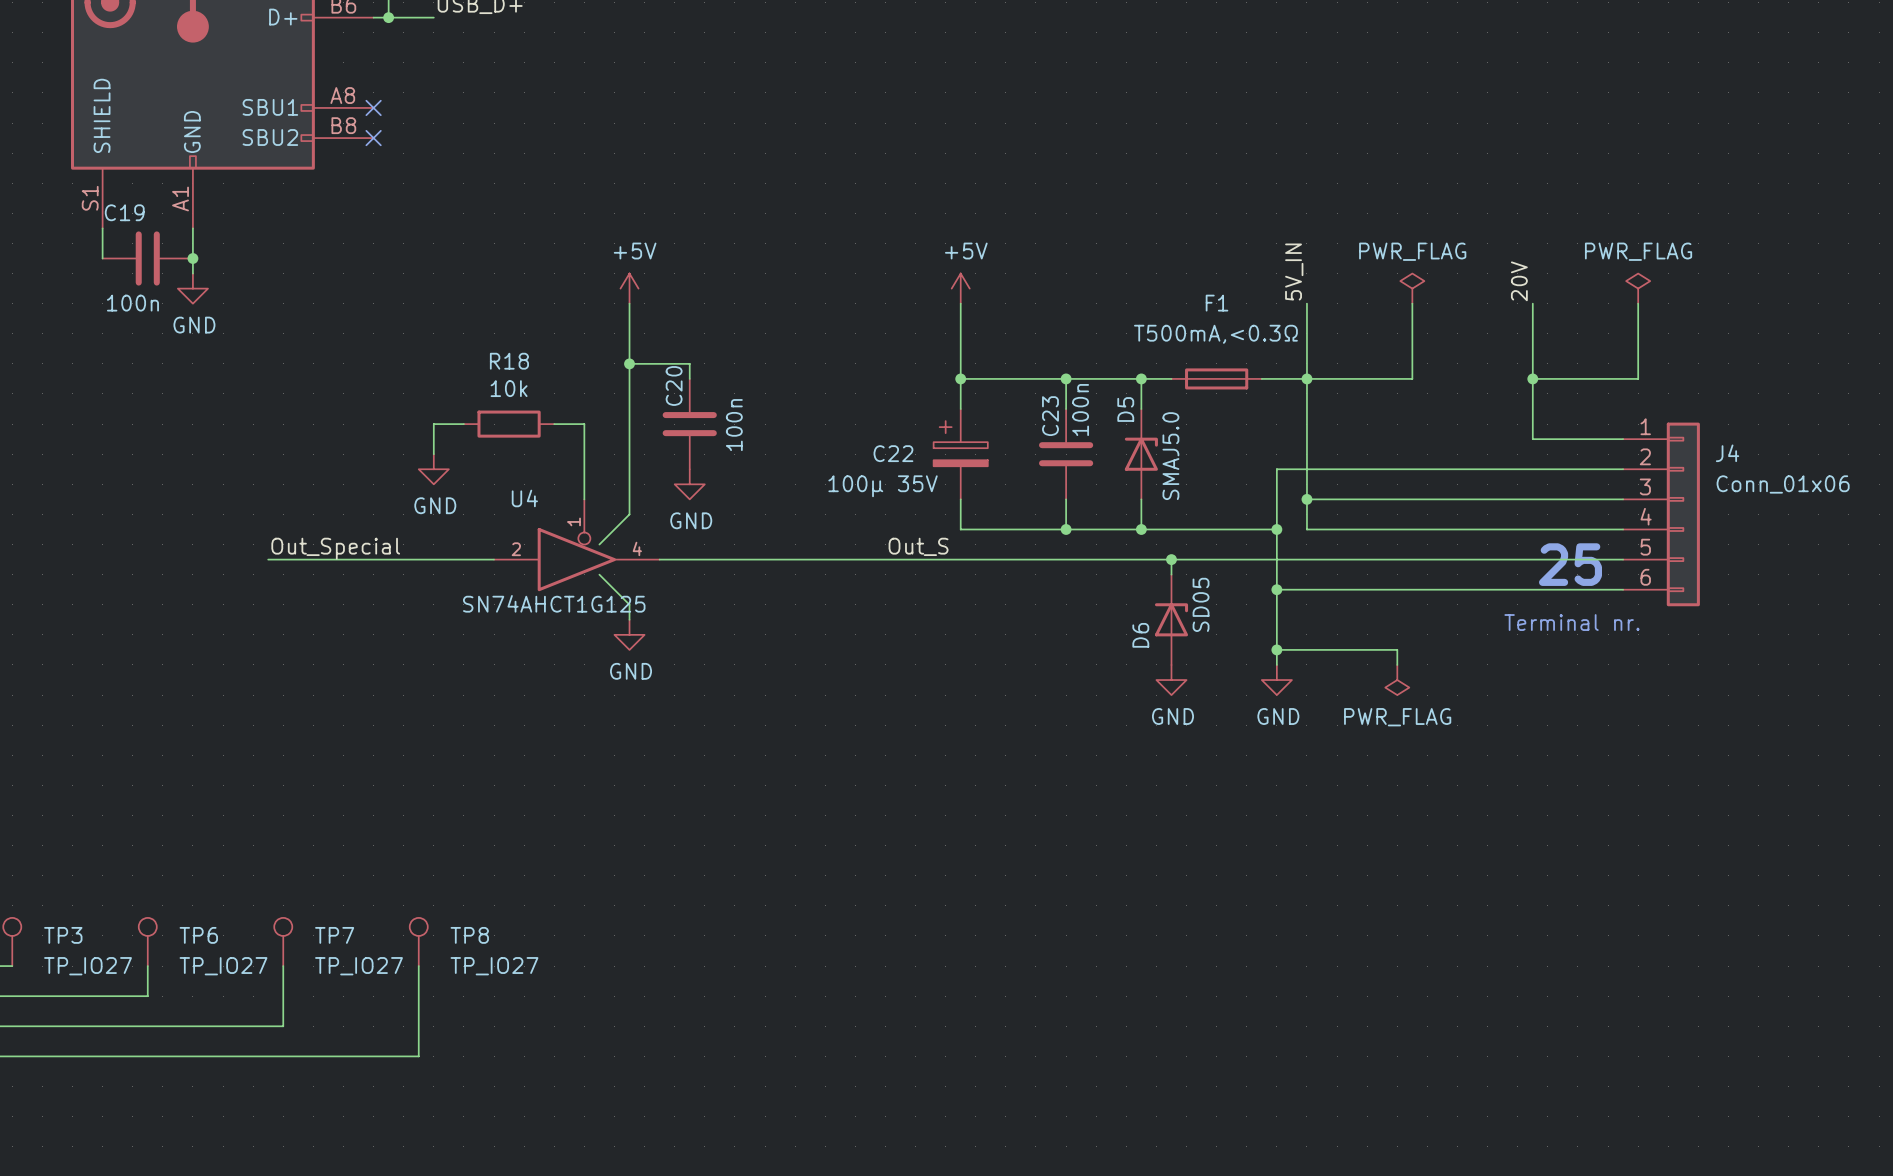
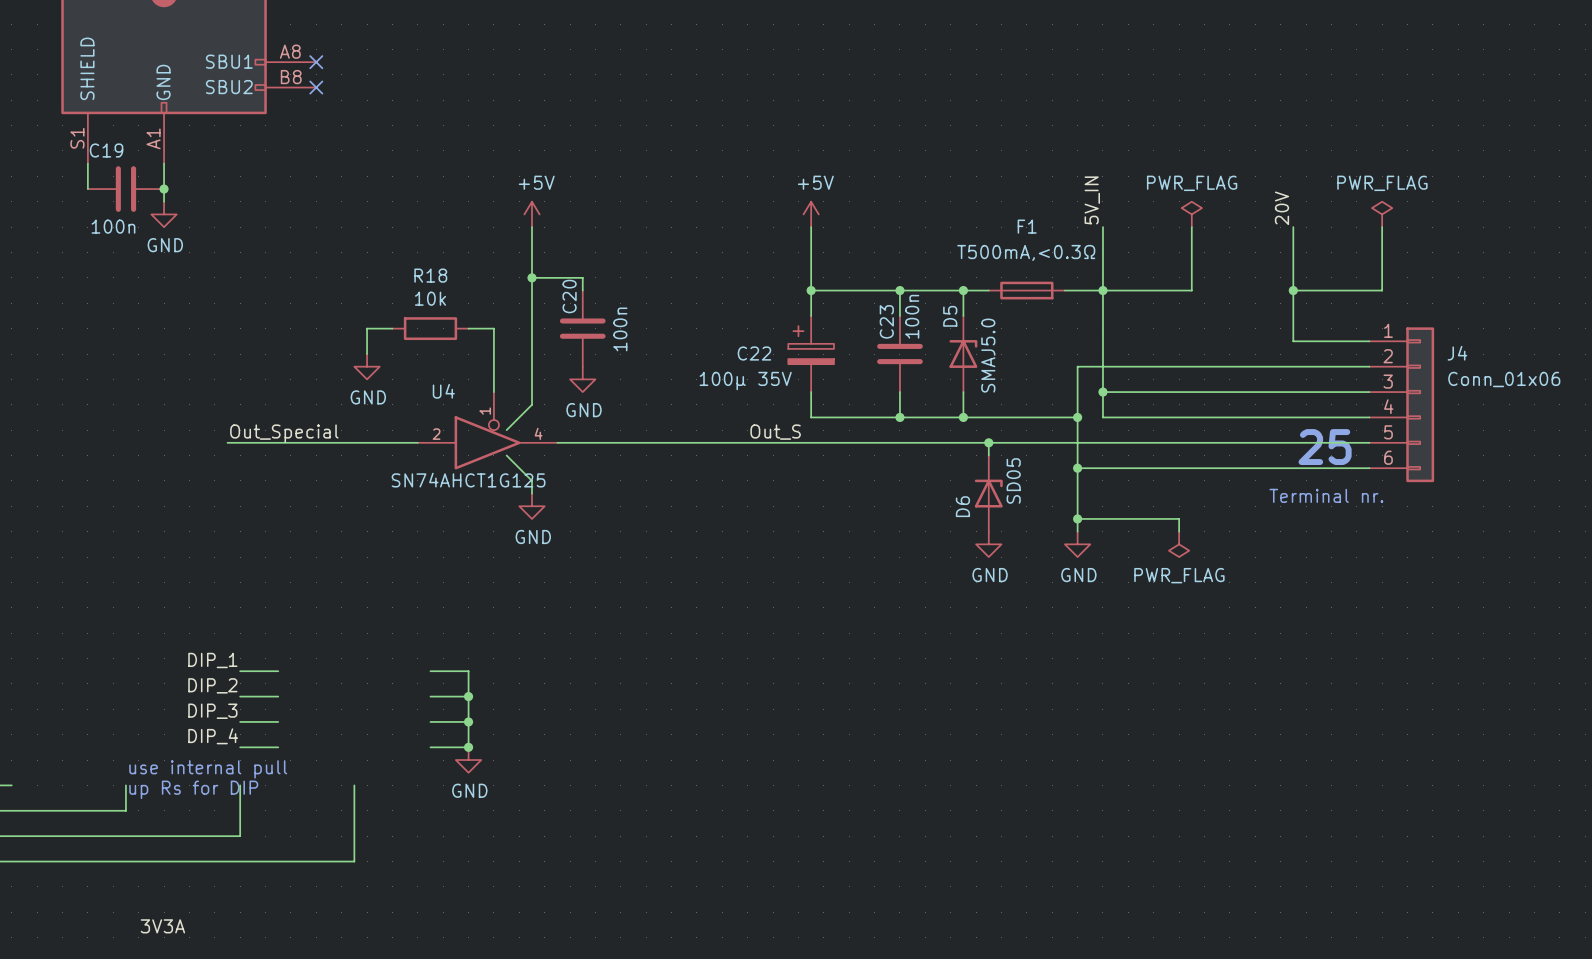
label: none -> DIP_1 (212, 660)
wire: none -> (240, 671) (278, 671)
wire: none -> (430, 671) (468, 671) (468, 747) (430, 747)
label: none -> DIP_2 (212, 685)
wire: none -> (240, 696) (278, 696)
wire: none -> (430, 696) (468, 696)
junction: none -> (468, 696)
label: none -> DIP_3 (212, 711)
wire: none -> (240, 721) (278, 721)
wire: none -> (430, 721) (468, 721)
junction: none -> (468, 721)
label: none -> DIP_4 (213, 736)
wire: none -> (240, 747) (278, 747)
junction: none -> (468, 747)
power symbol: none -> GND (468, 760)
TP3: TP_IO27 (12, 941) -> none
TP6: TP_IO27 (147, 941) -> none
TP7: TP_IO27 (283, 941) -> none
TP8: TP_IO27 (418, 941) -> none
text: none -> use internal pull (208, 769)
text: none -> up Rs for DIP (193, 789)
label: none -> 3V3A (162, 926)

